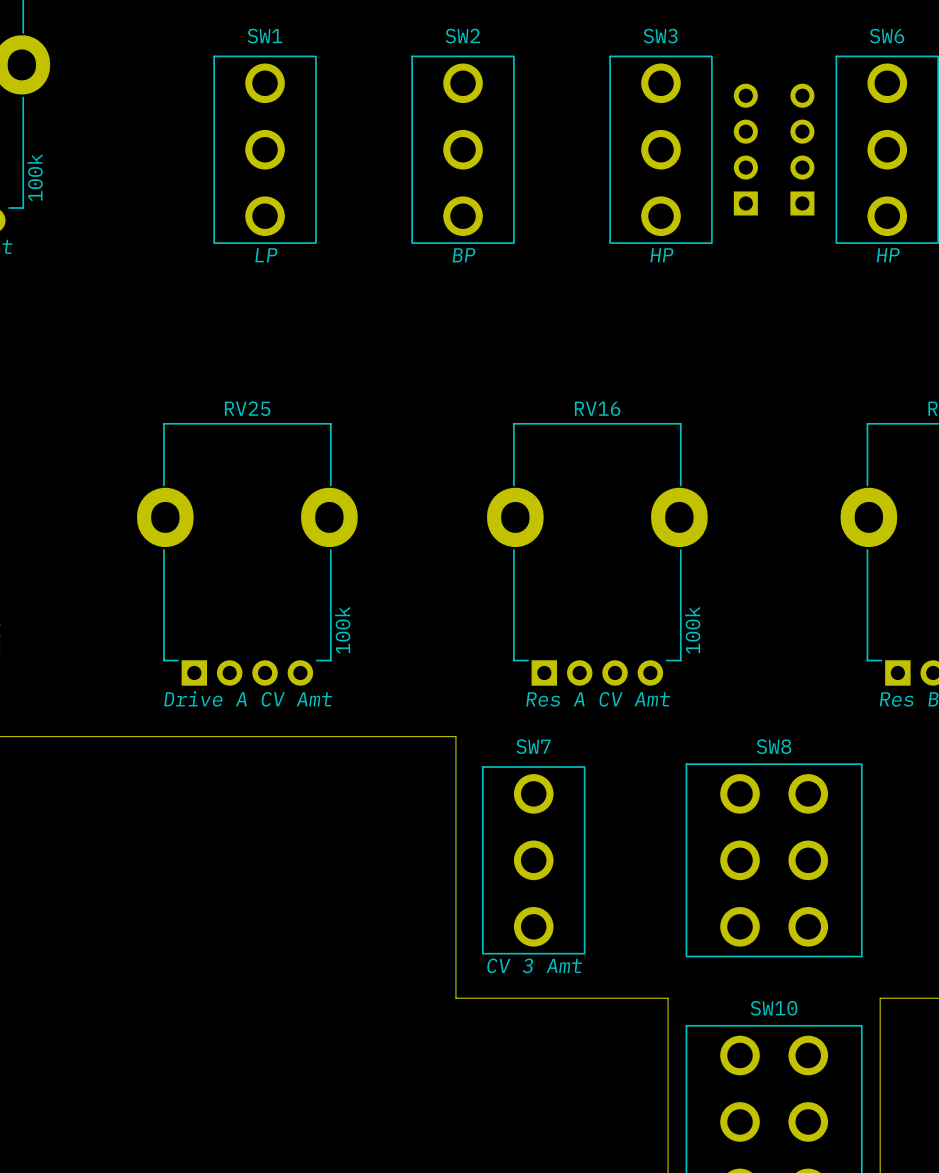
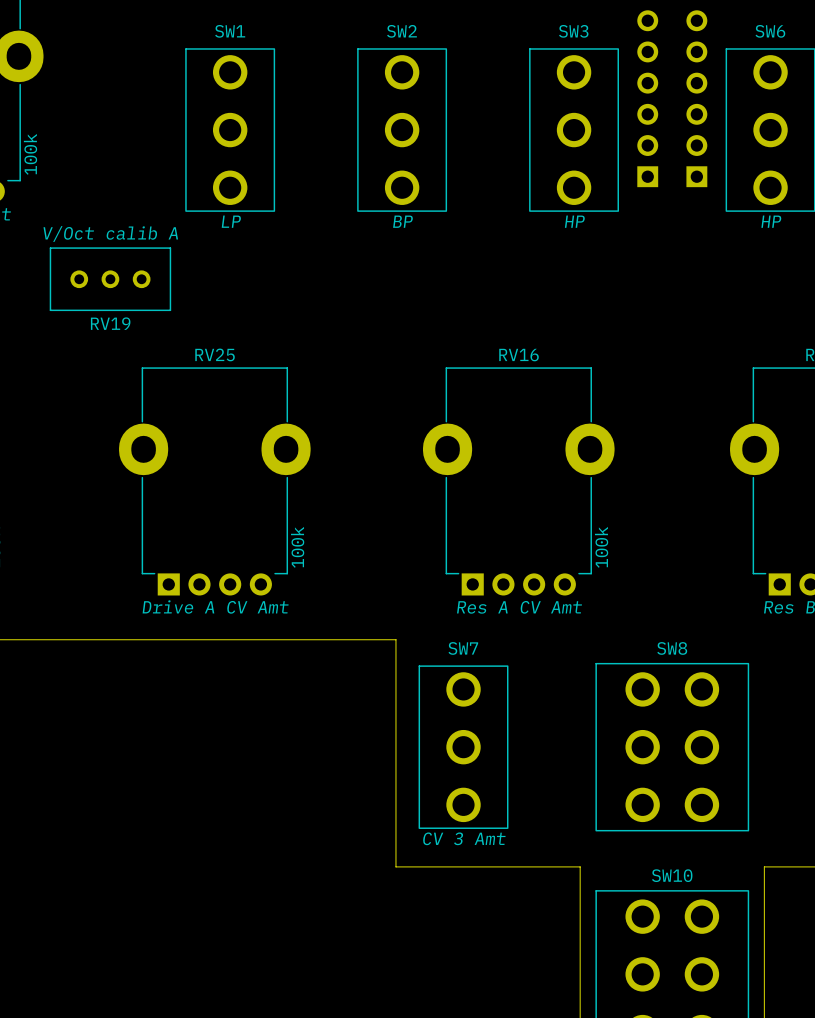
part: none -> (647, 98)
part: none -> (696, 98)
RV19: none -> (110, 279)

